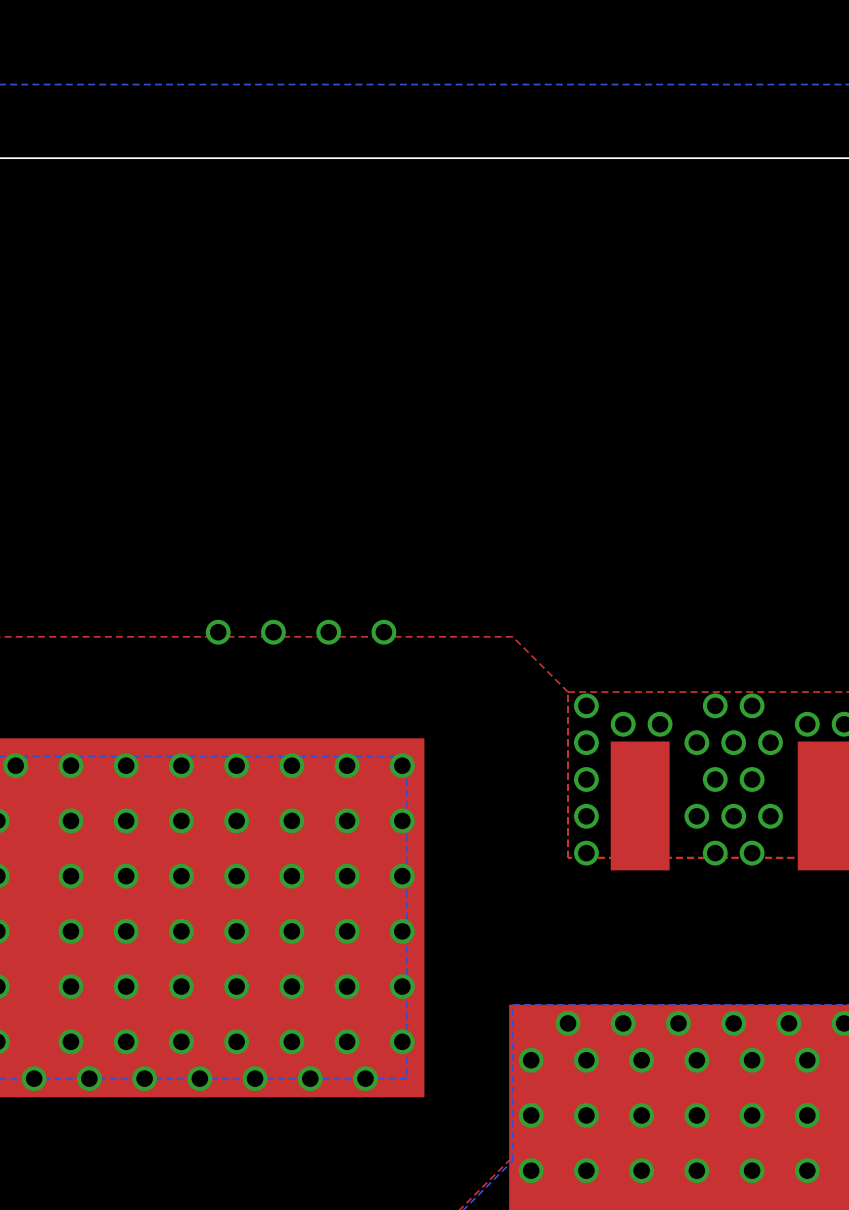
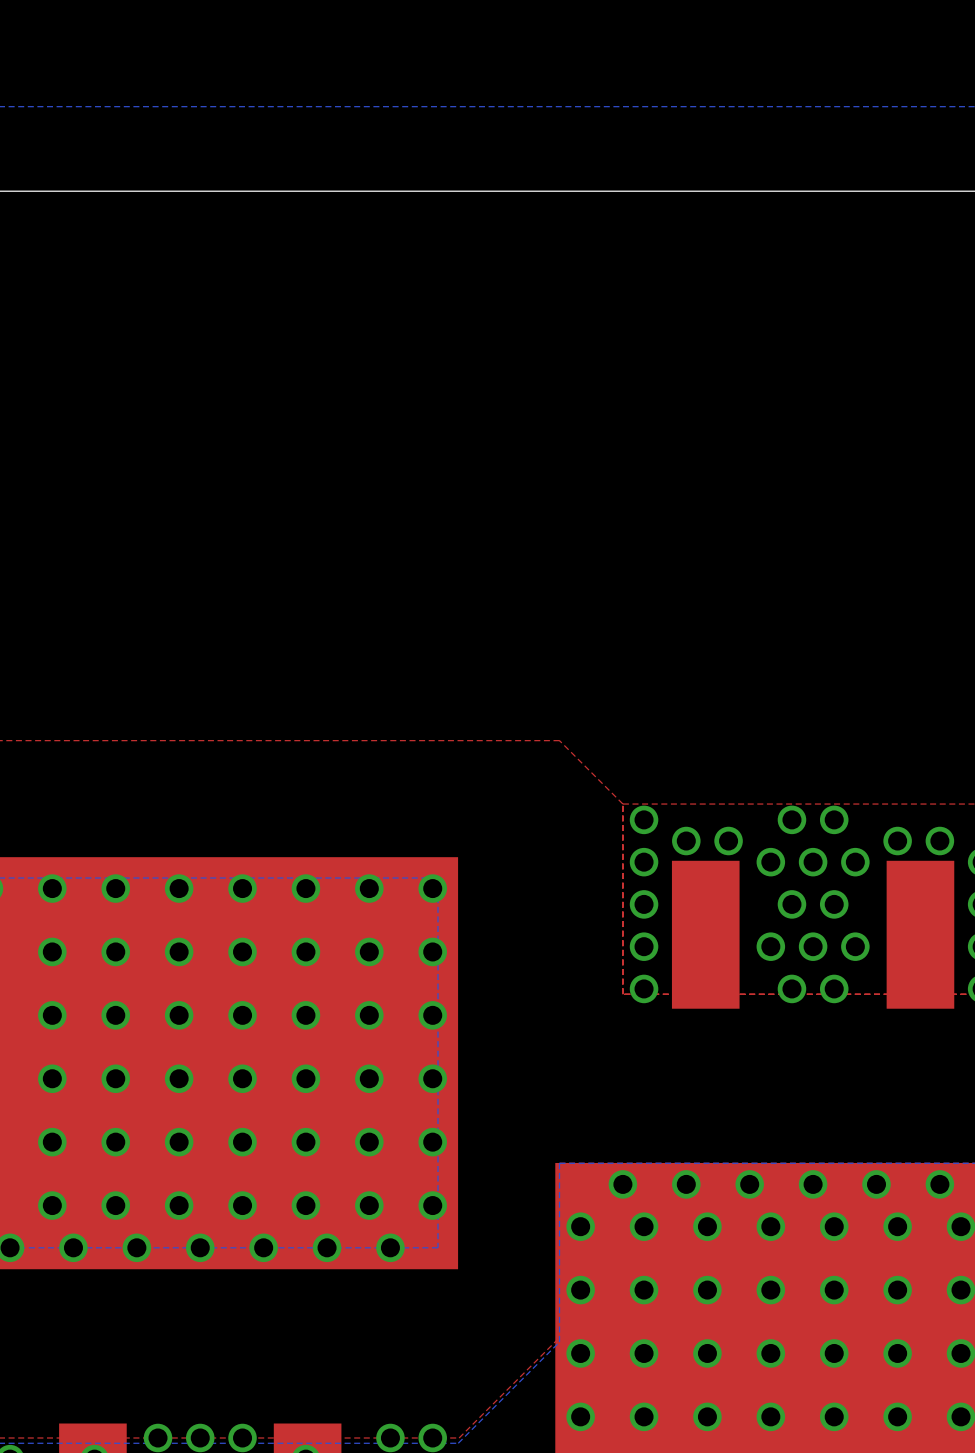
via: (218, 632) -> none
via: (273, 632) -> none
via: (328, 632) -> none
via: (383, 632) -> none

